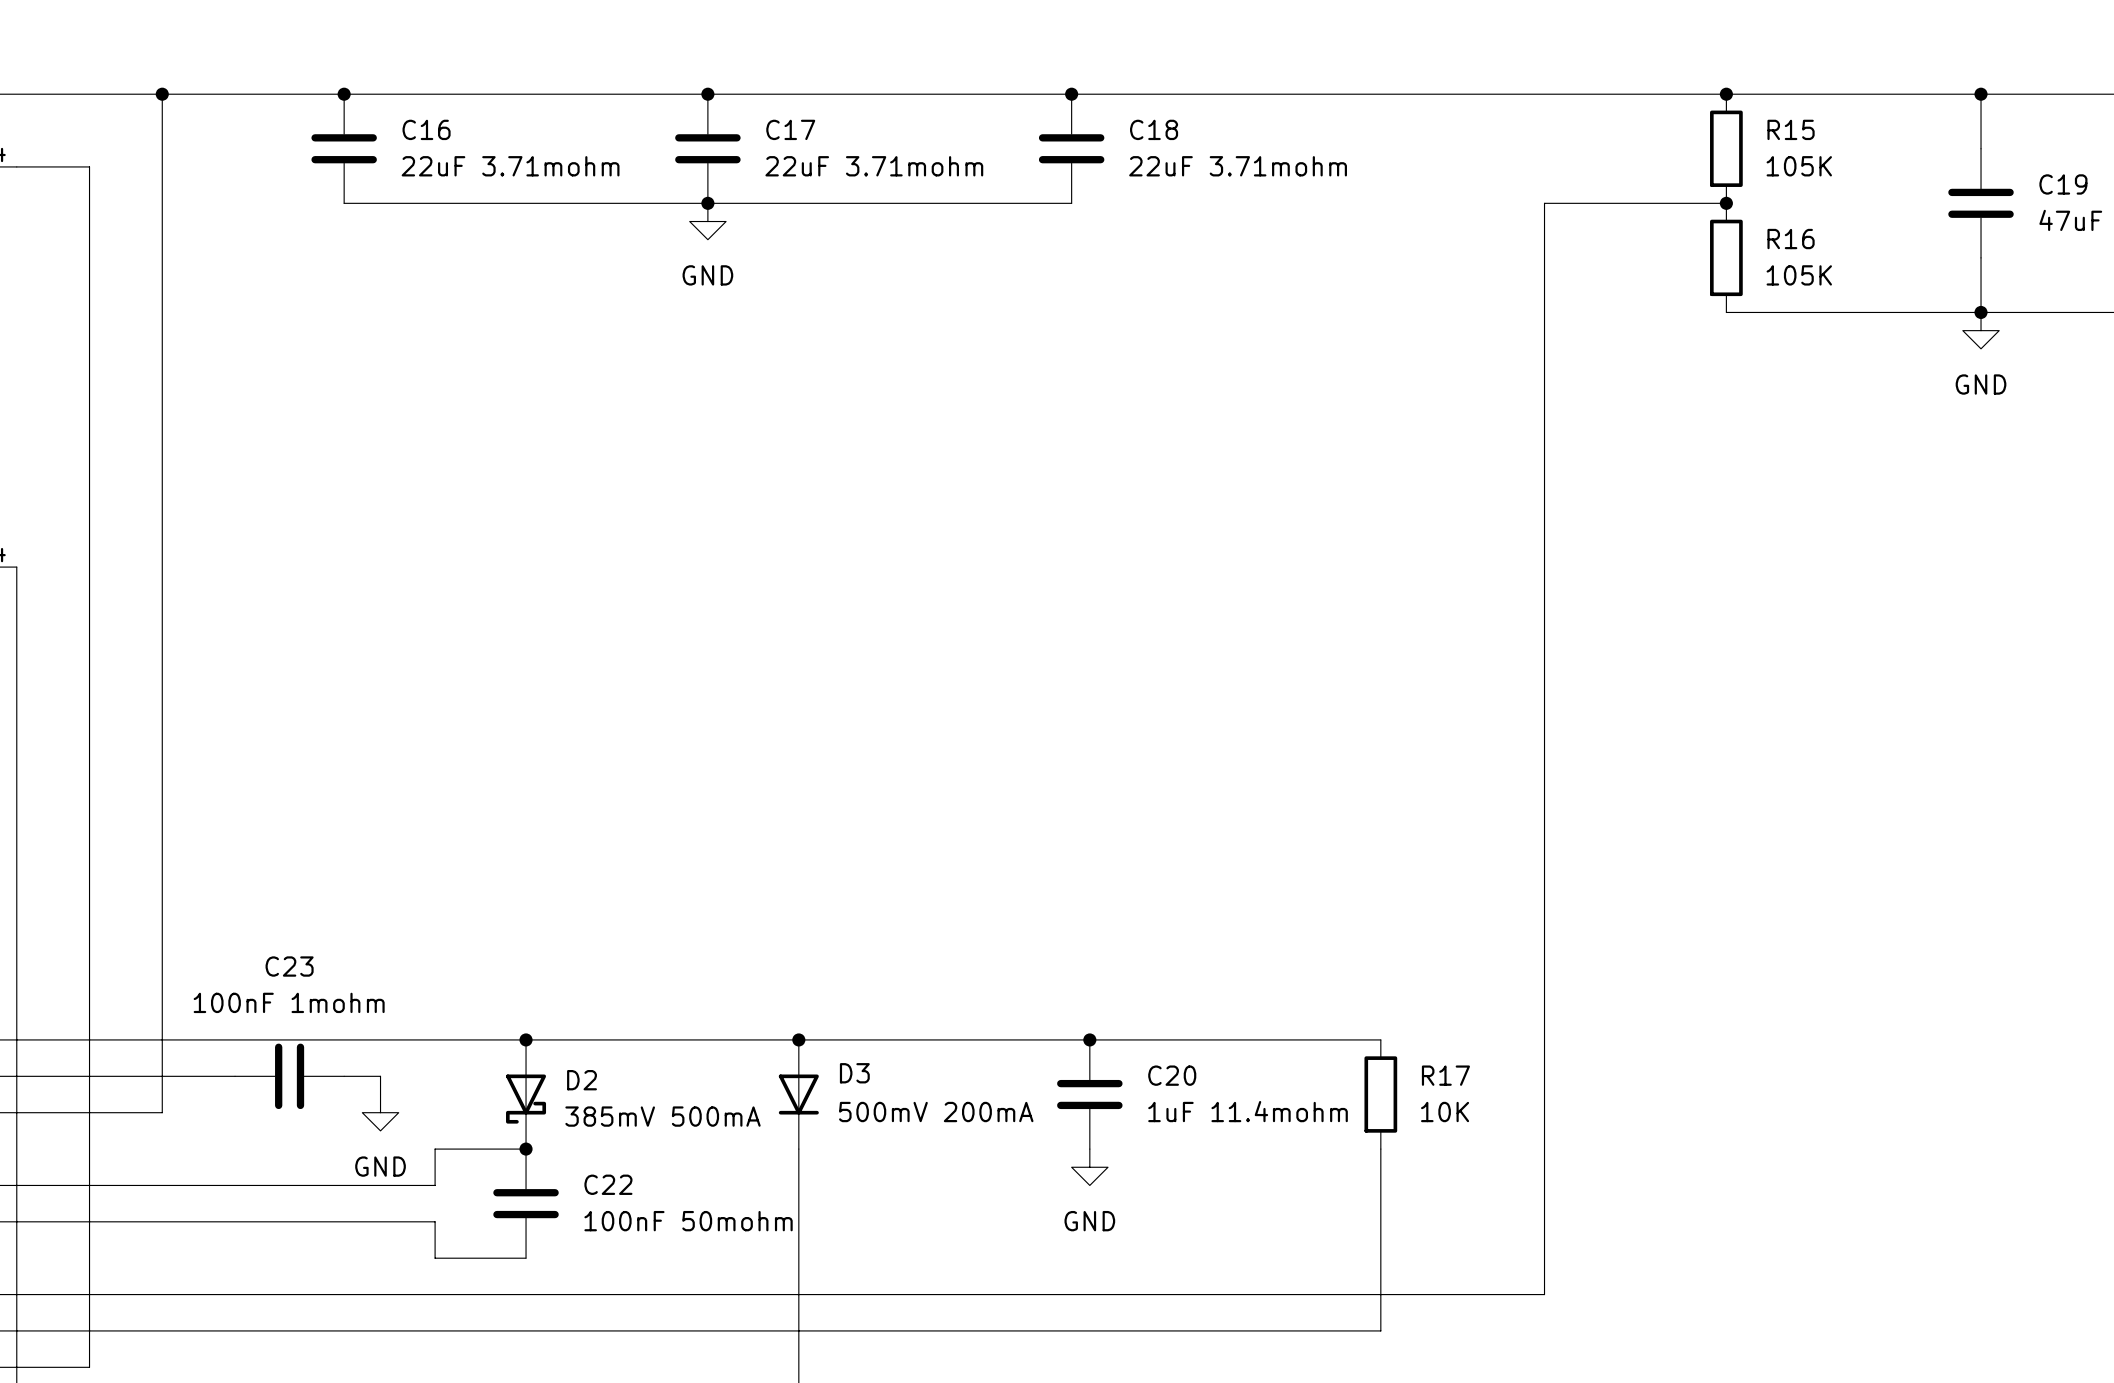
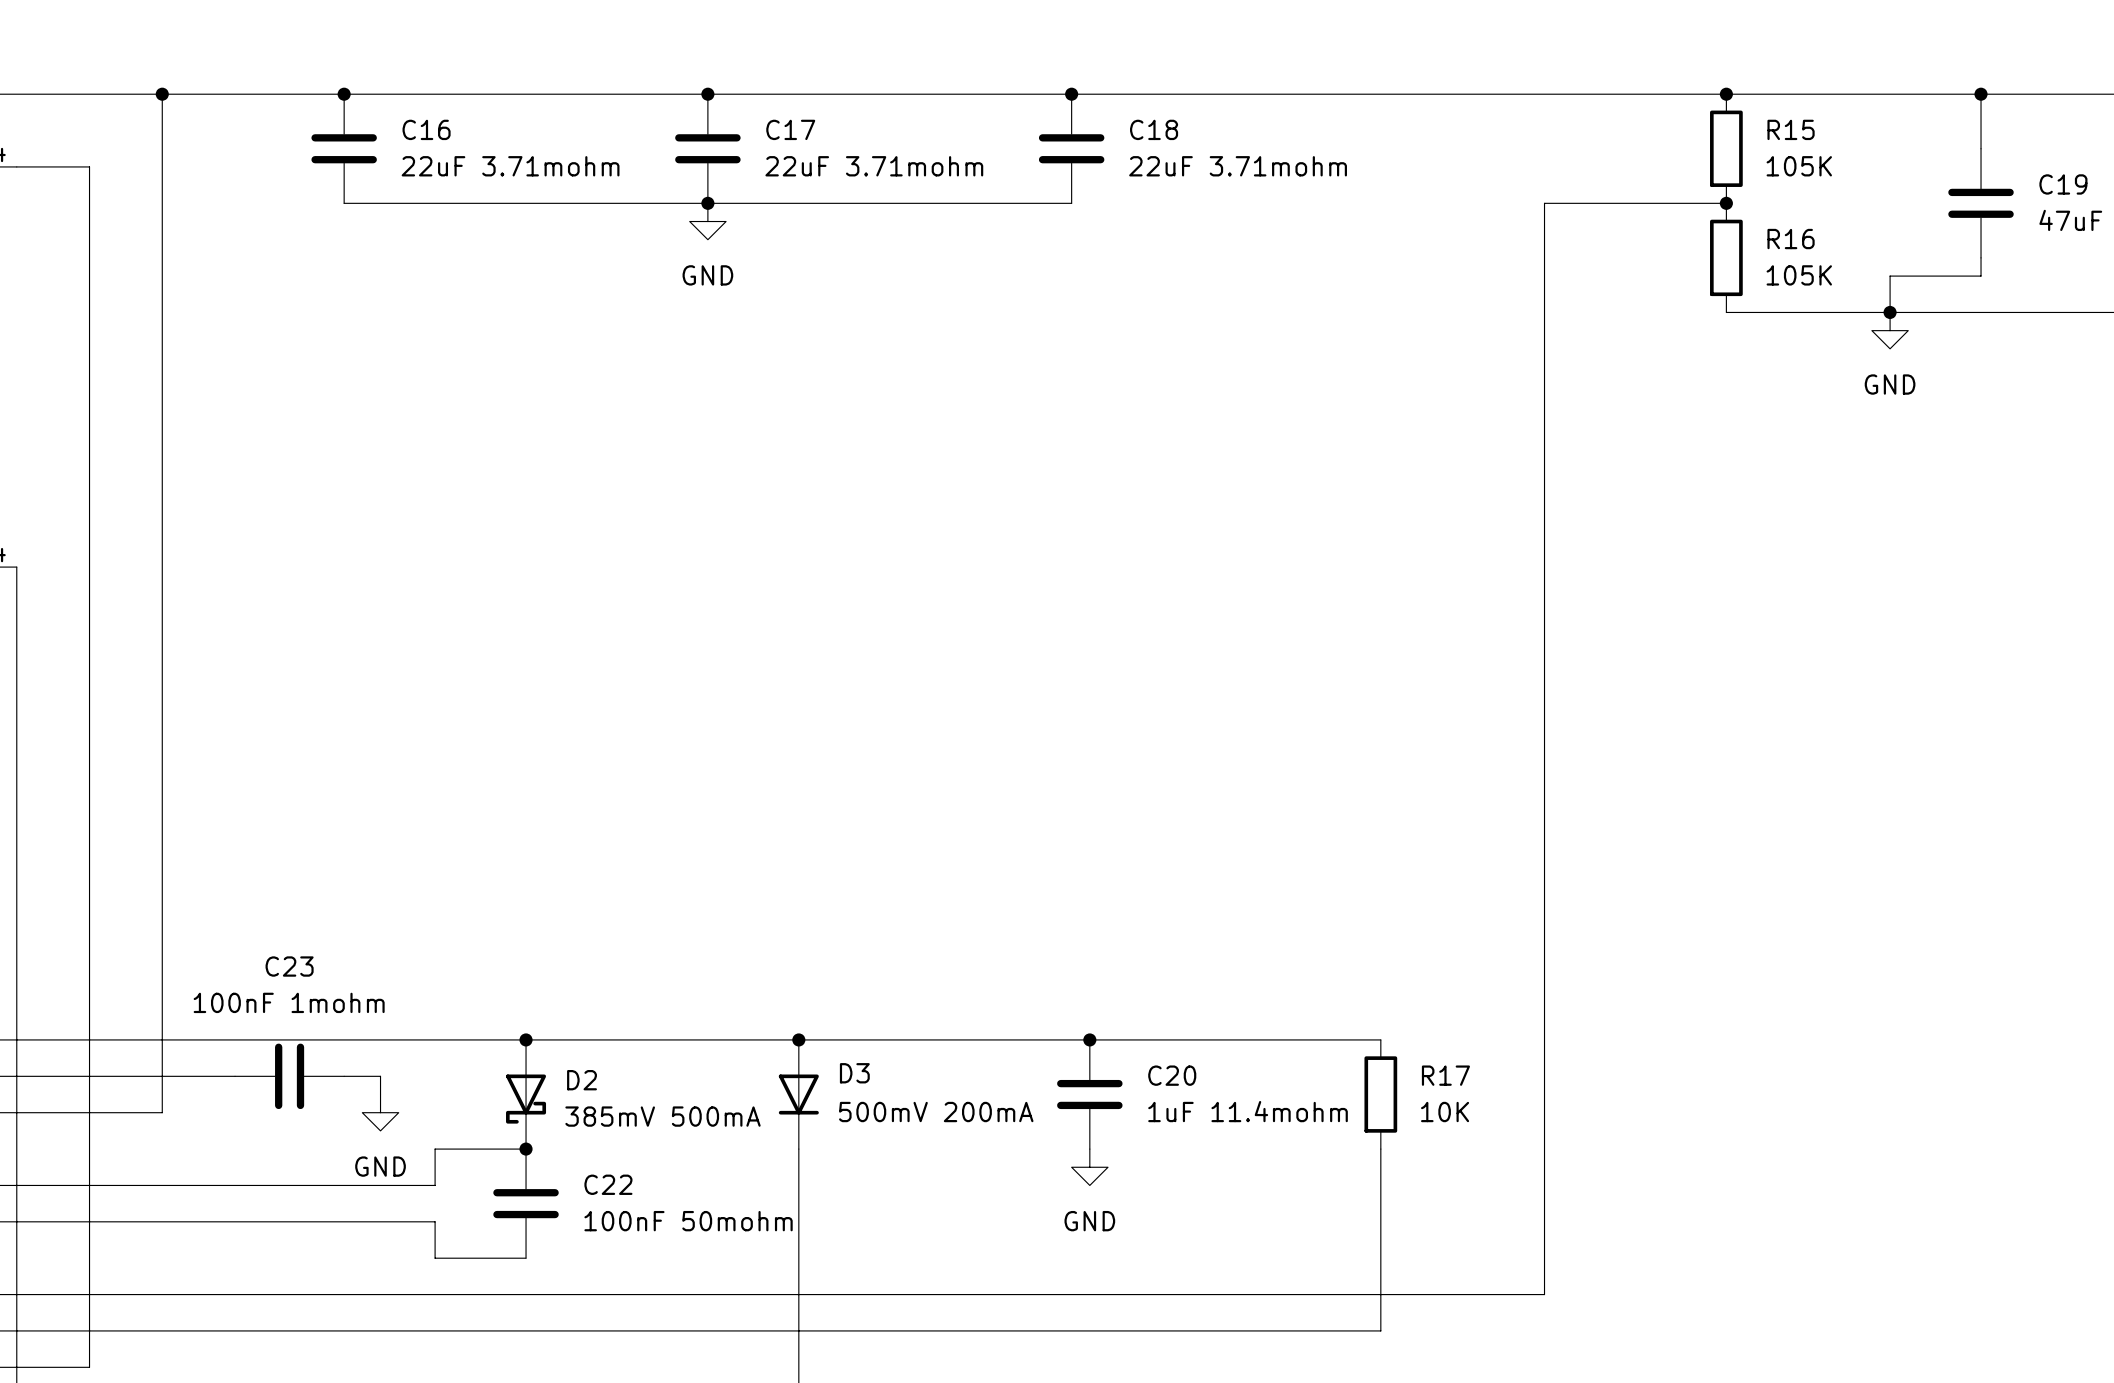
wire: (1981, 276) (1981, 312) -> (1981, 276) (1890, 276) (1890, 312)
junction: none -> (1890, 312)
junction: (1981, 312) -> none
power symbol position: GND (1981, 330) -> GND (1890, 330)

